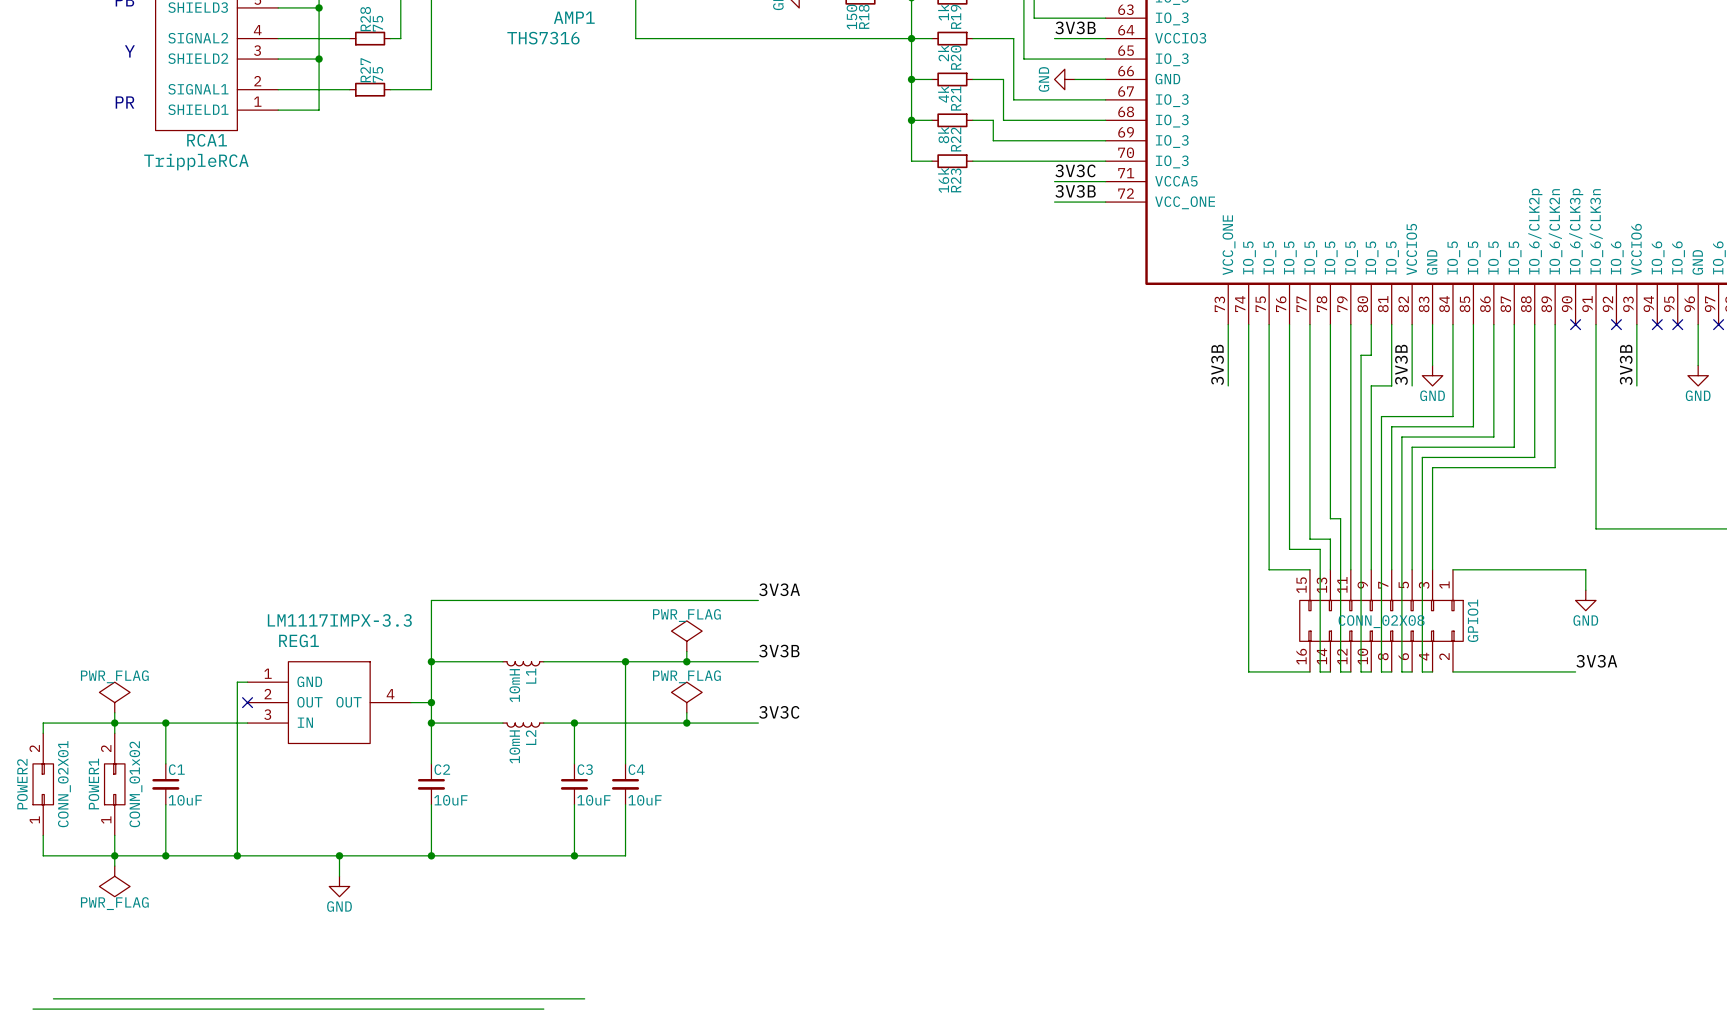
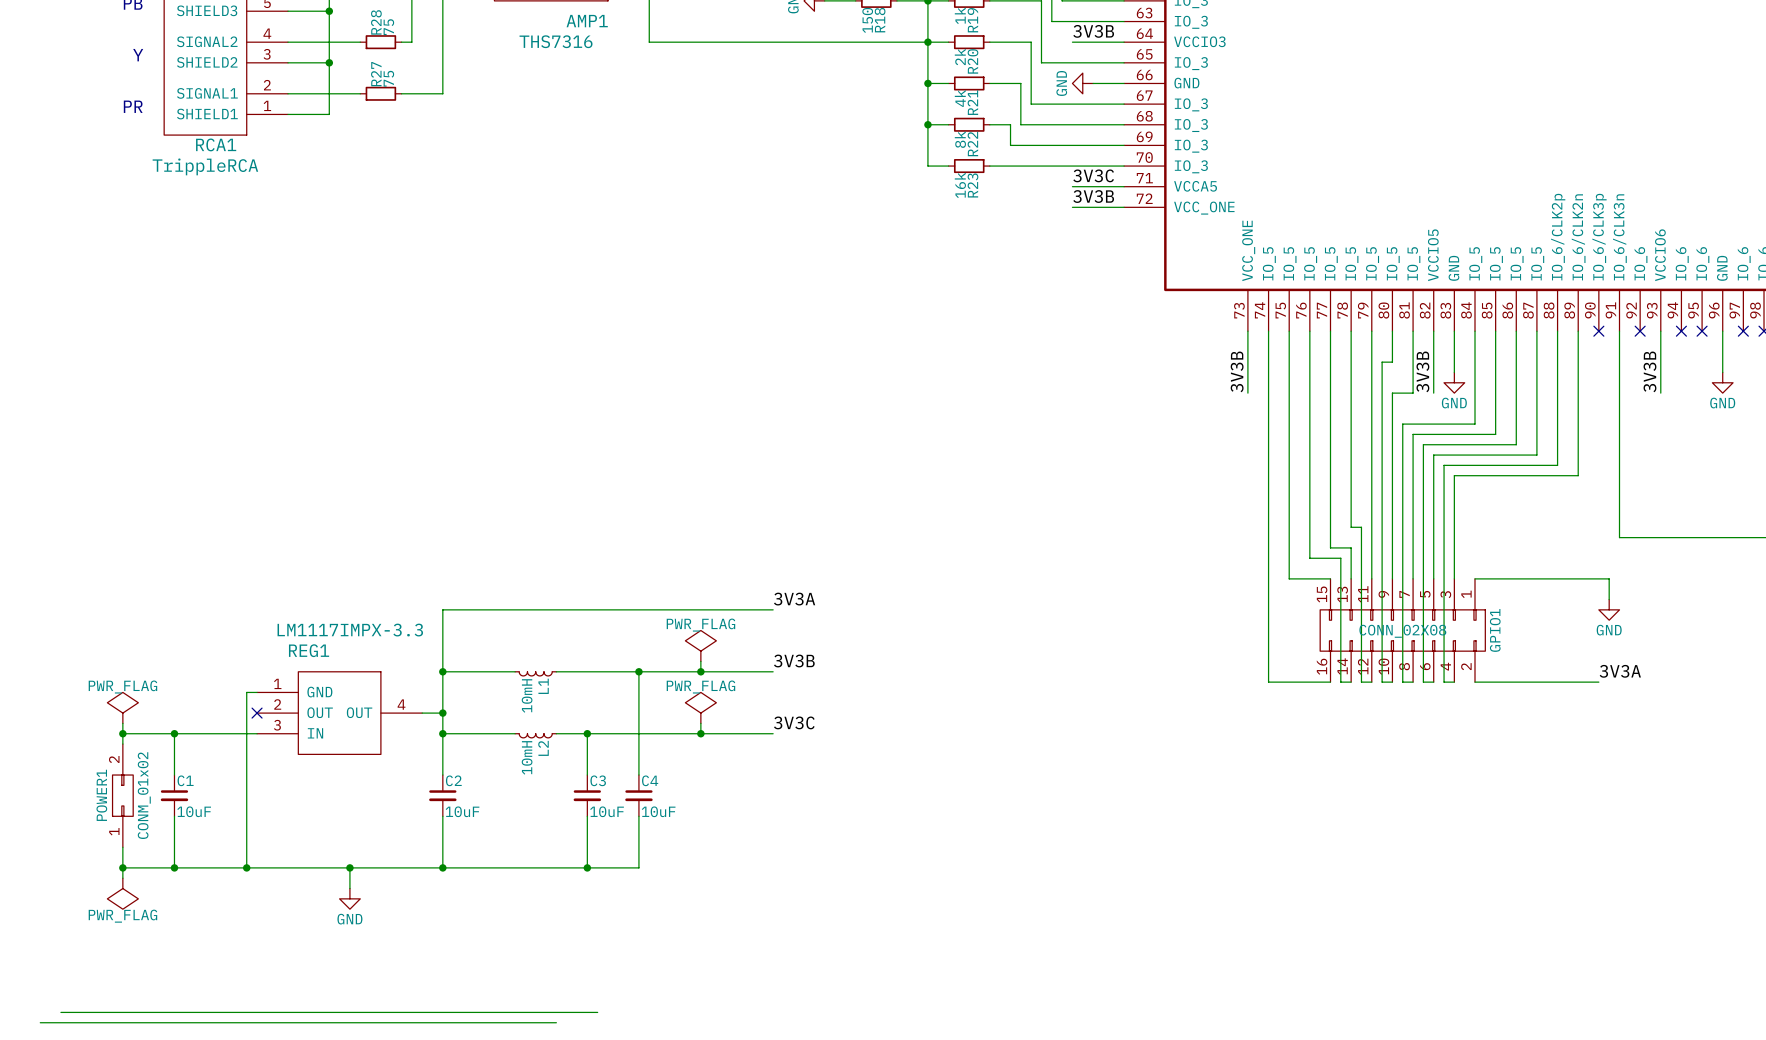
wire: (114, 723) (43, 723) (43, 733) -> none
POWER2: CONN_02X01 (43, 784) -> none
wire: (43, 835) (43, 855) (114, 855) -> none

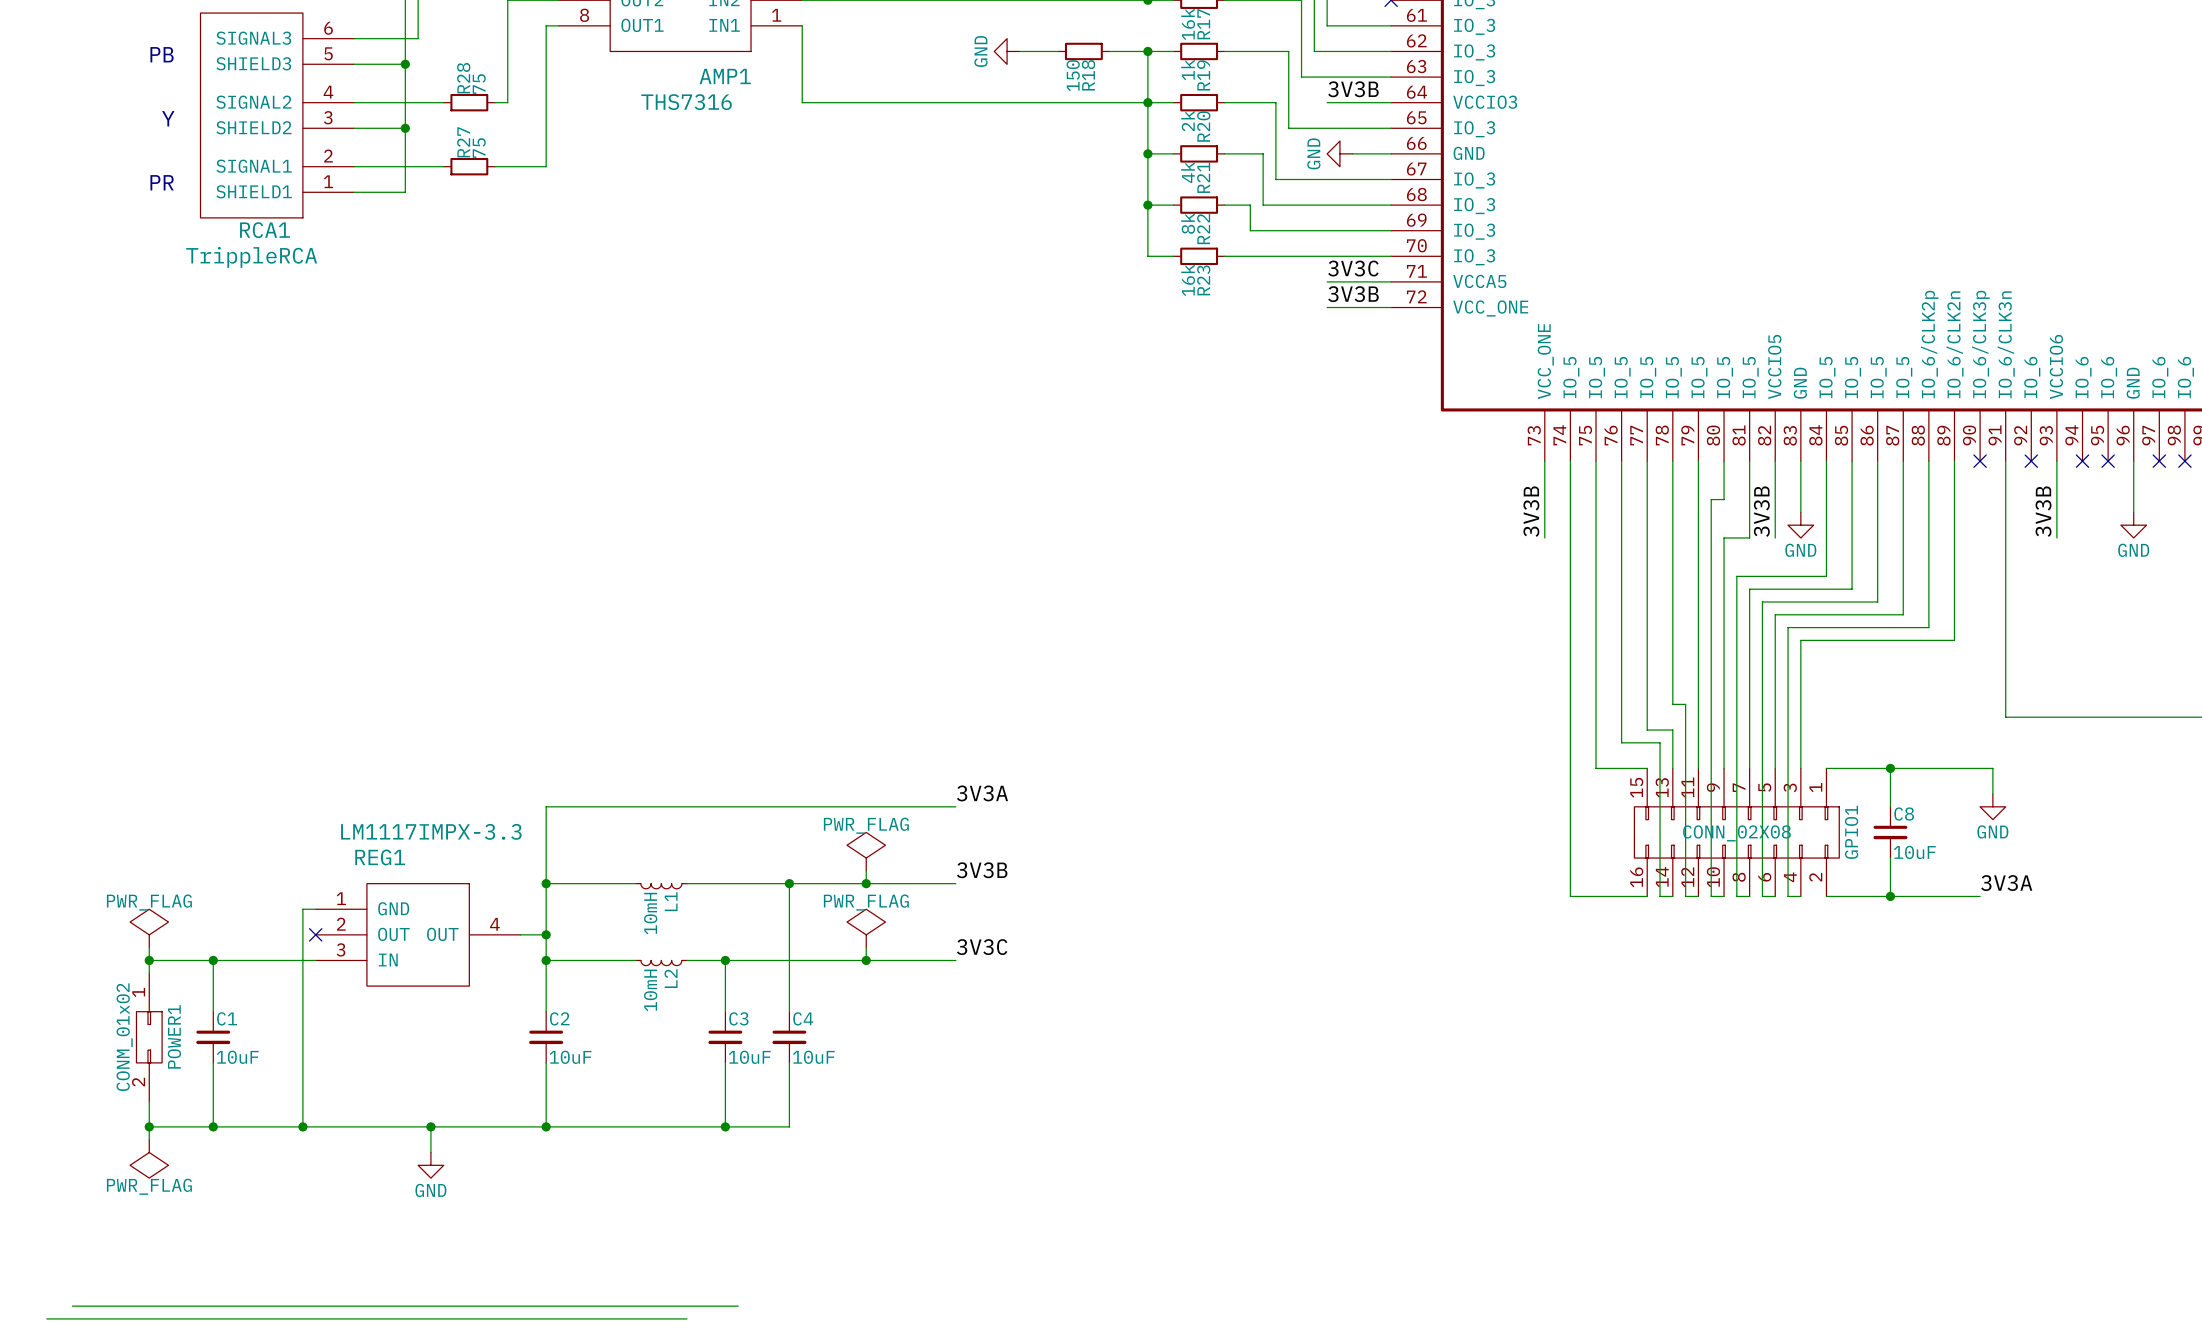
wire: none -> (1890, 768) (1890, 806)
junction: none -> (1890, 768)
C8: none -> 10uF (1890, 832)
wire: none -> (1890, 858) (1890, 896)
junction: none -> (1890, 896)
POWER1 rotation: 0° (122, 795) -> 180° (149, 1037)

